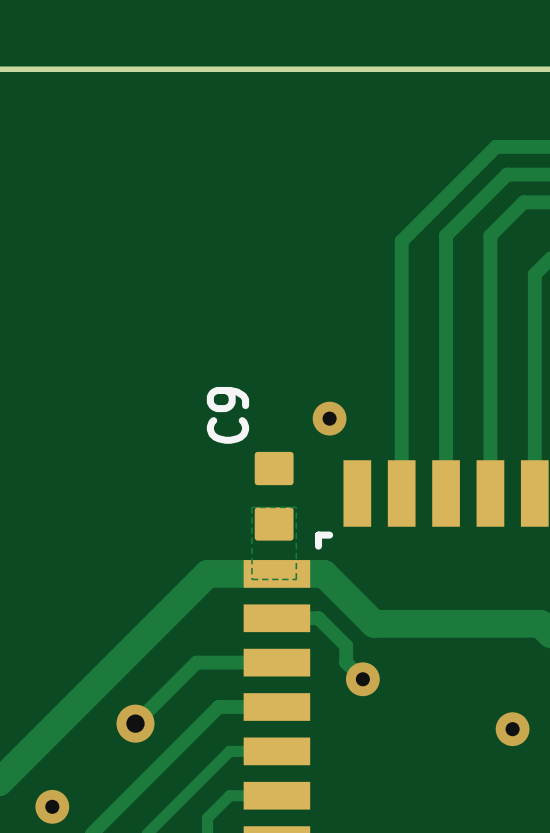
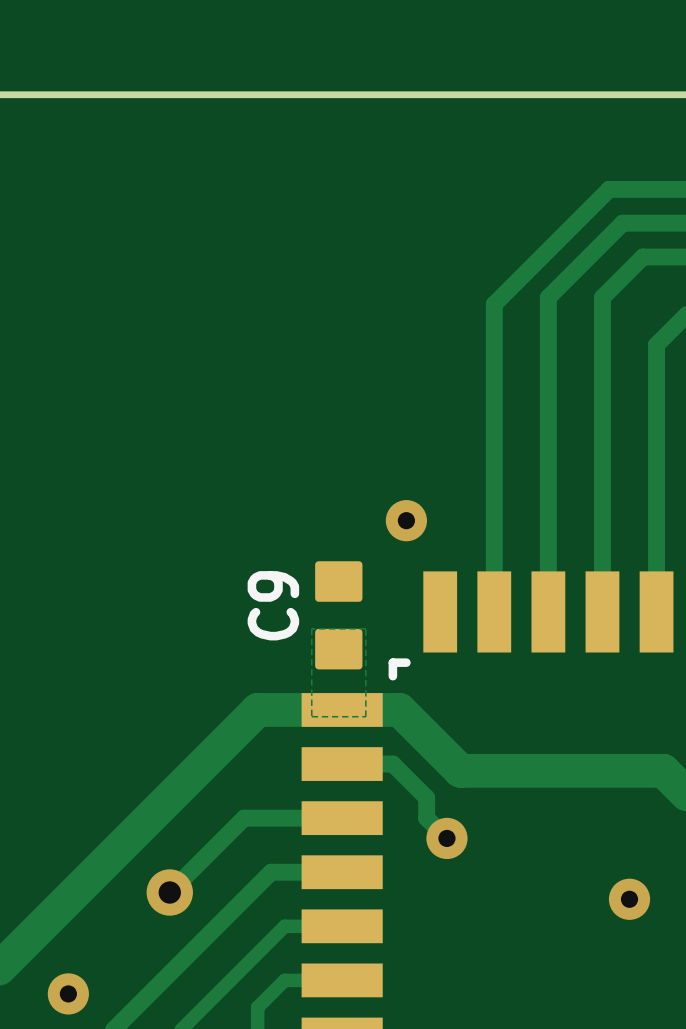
C9 name position: C9 (227, 415) -> C9 (273, 605)

